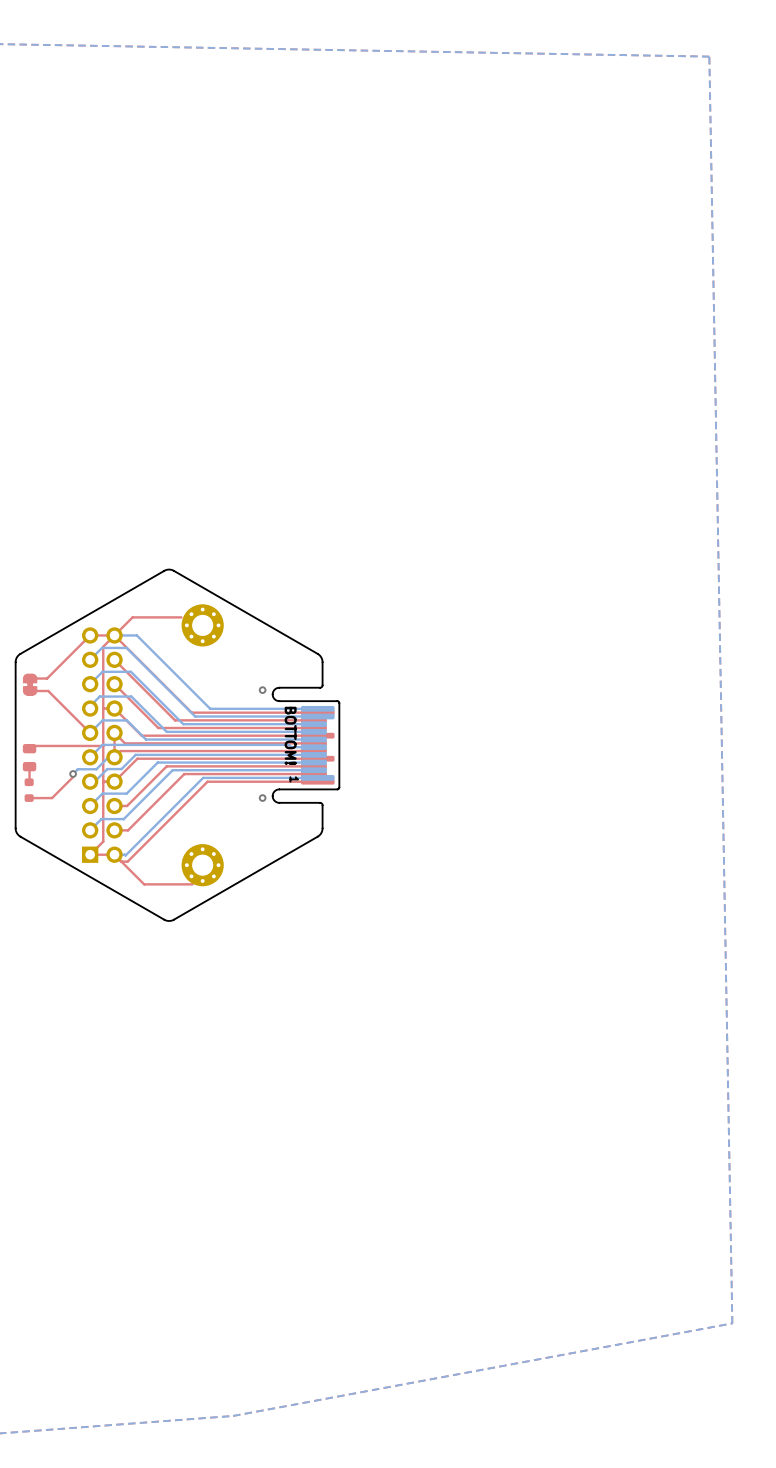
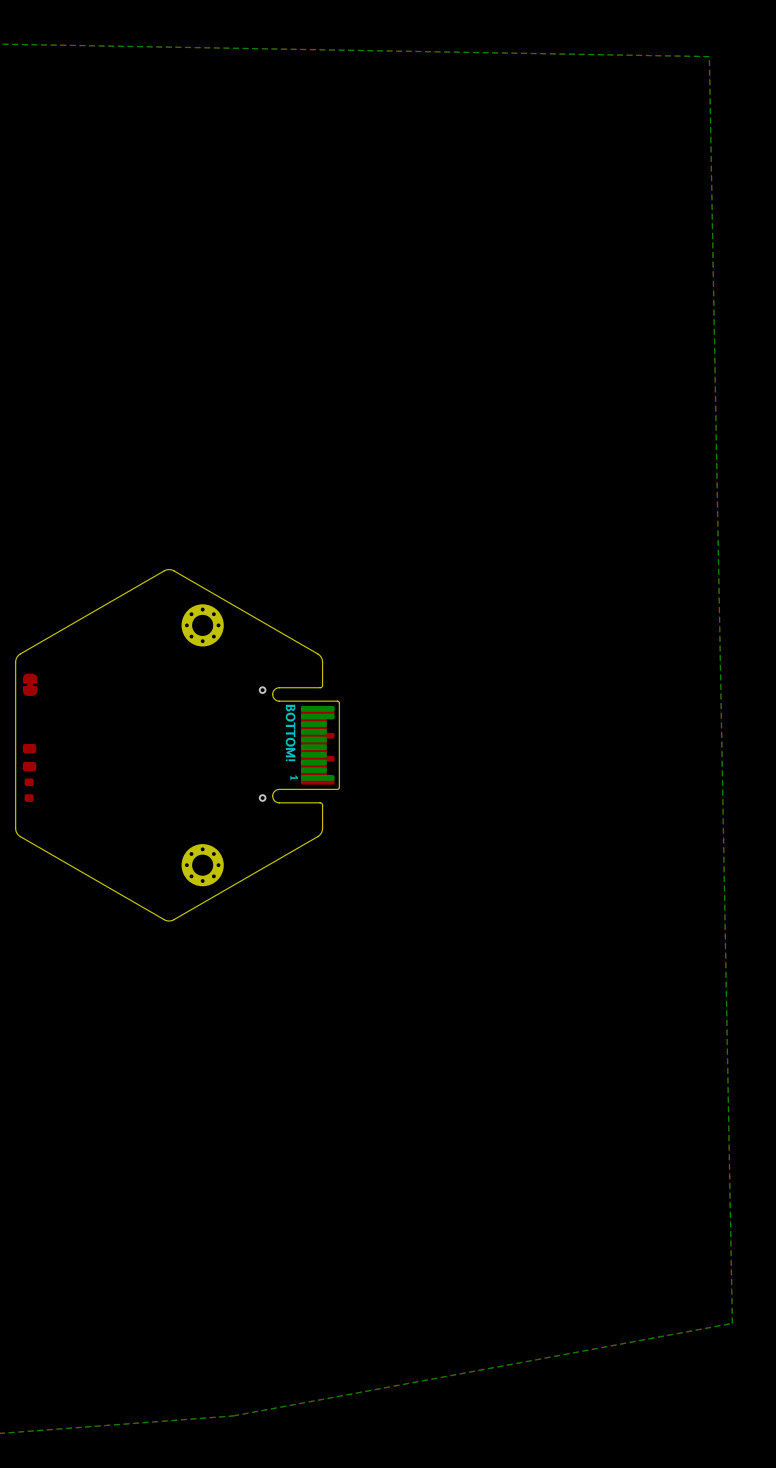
top track: (181, 617) (132, 617) (103, 646) (103, 841) (90, 854) (114, 854) (144, 884) (192, 884) -> none
bottom track: (114, 635) (136, 635) (210, 708) (317, 708) -> none
bottom track: (90, 659) (102, 647) (126, 647) (195, 716) (317, 716) -> none
top track: (114, 659) (175, 720) (313, 720) -> none
top track: (30, 678) (47, 678) (90, 635) (114, 635) (191, 712) (317, 712) -> none
bottom track: (90, 684) (102, 671) (130, 671) (183, 724) (313, 724) -> none
top track: (114, 684) (158, 728) (313, 728) -> none
top track: (30, 690) (48, 690) (90, 732) -> none
bottom track: (90, 708) (99, 696) (131, 696) (166, 731) (313, 731) -> none
top track: (103, 708) (114, 708) (141, 735) (317, 735) -> none
bottom track: (90, 732) (102, 720) (126, 720) (145, 739) (313, 739) -> none
top track: (313, 743) (124, 743) (114, 732) (114, 757) (120, 751) (313, 751) -> none
part: (102, 745) -> none
top track: (103, 745) (32, 745) (29, 748) -> none
bottom track: (313, 747) (291, 747) (289, 744) (102, 744) (90, 757) -> none
bottom track: (313, 754) (135, 754) (121, 769) (107, 769) (94, 781) (90, 781) -> none
bottom track: (114, 757) (108, 757) (96, 769) (77, 769) (73, 773) -> none
top track: (317, 758) (137, 758) (114, 781) (103, 782) -> none
bottom track: (313, 762) (157, 762) (126, 793) (102, 793) (90, 806) -> none
top track: (29, 766) (29, 782) -> none
top track: (313, 766) (166, 766) (127, 806) (114, 806) -> none
bottom track: (313, 770) (172, 770) (123, 819) -> none
top track: (73, 773) (73, 777) (52, 798) (29, 798) -> none
via: (73, 773) -> none
top track: (313, 774) (184, 774) (128, 830) (114, 830) -> none
bottom track: (317, 777) (203, 777) (125, 855) (114, 854) -> none
top track: (317, 781) (207, 781) (127, 861) (121, 861) -> none
bottom track: (123, 819) (101, 819) (90, 830) -> none

